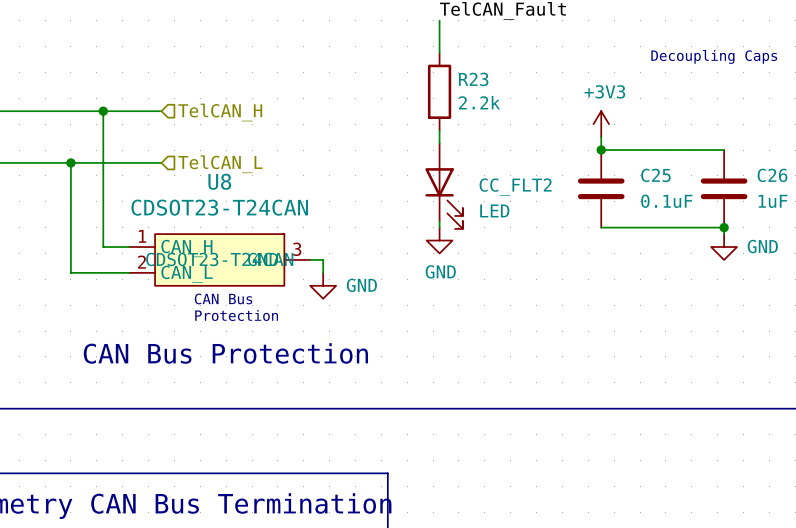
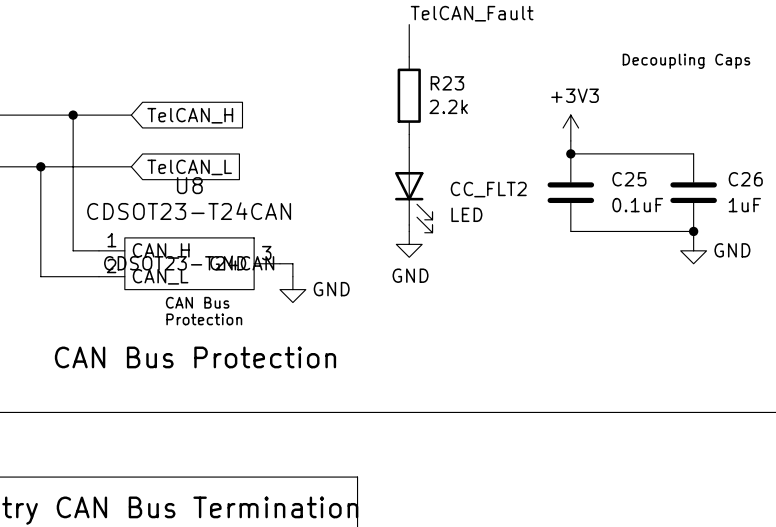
global label: none -> TelCAN_H (190, 115)
hierarchical label: TelCAN_H (220, 112) -> none
global label: none -> TelCAN_L (189, 167)
hierarchical label: TelCAN_L (220, 164) -> none

